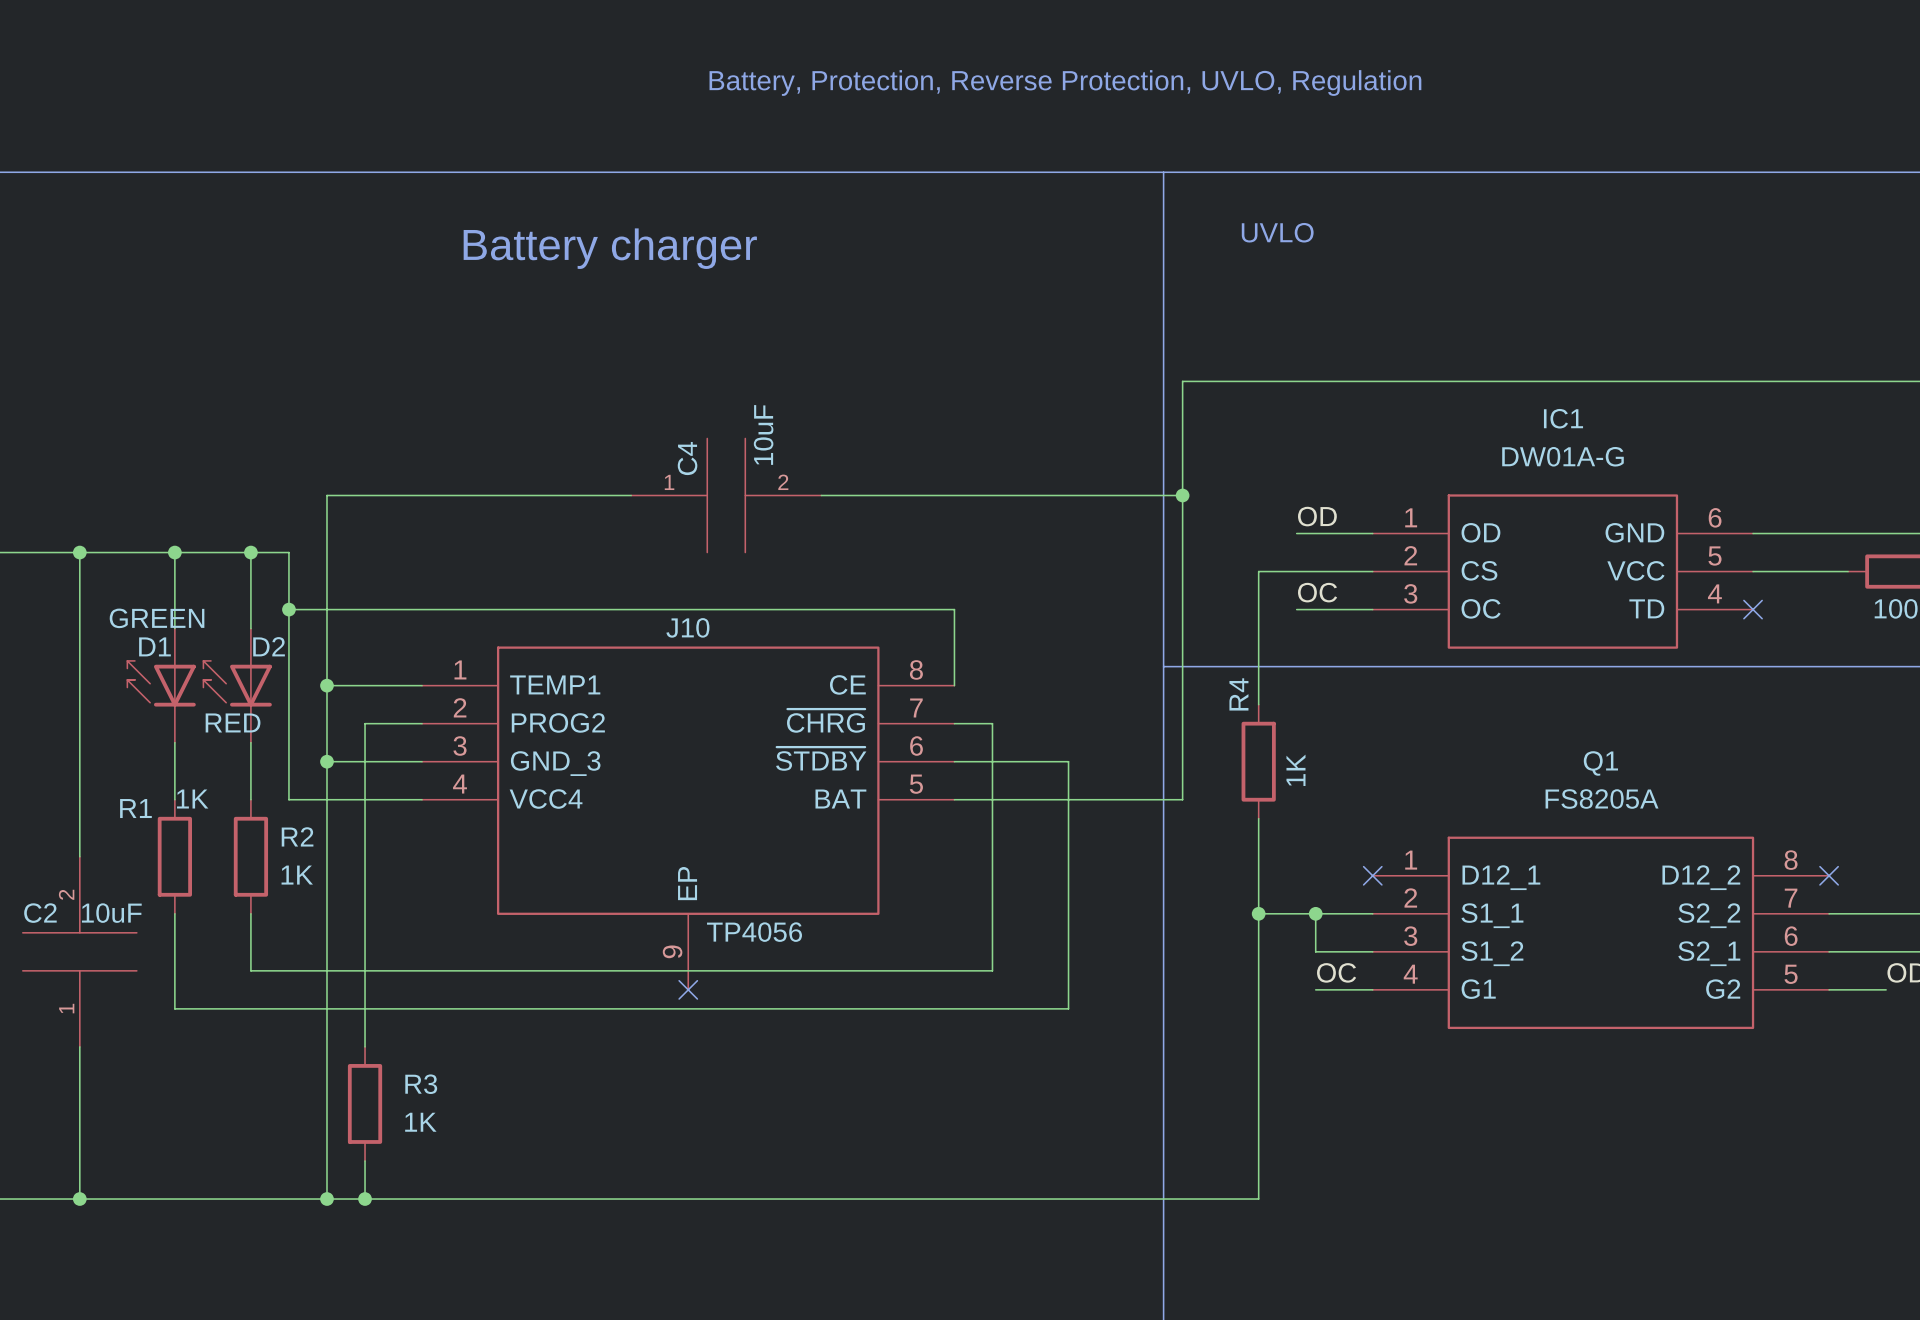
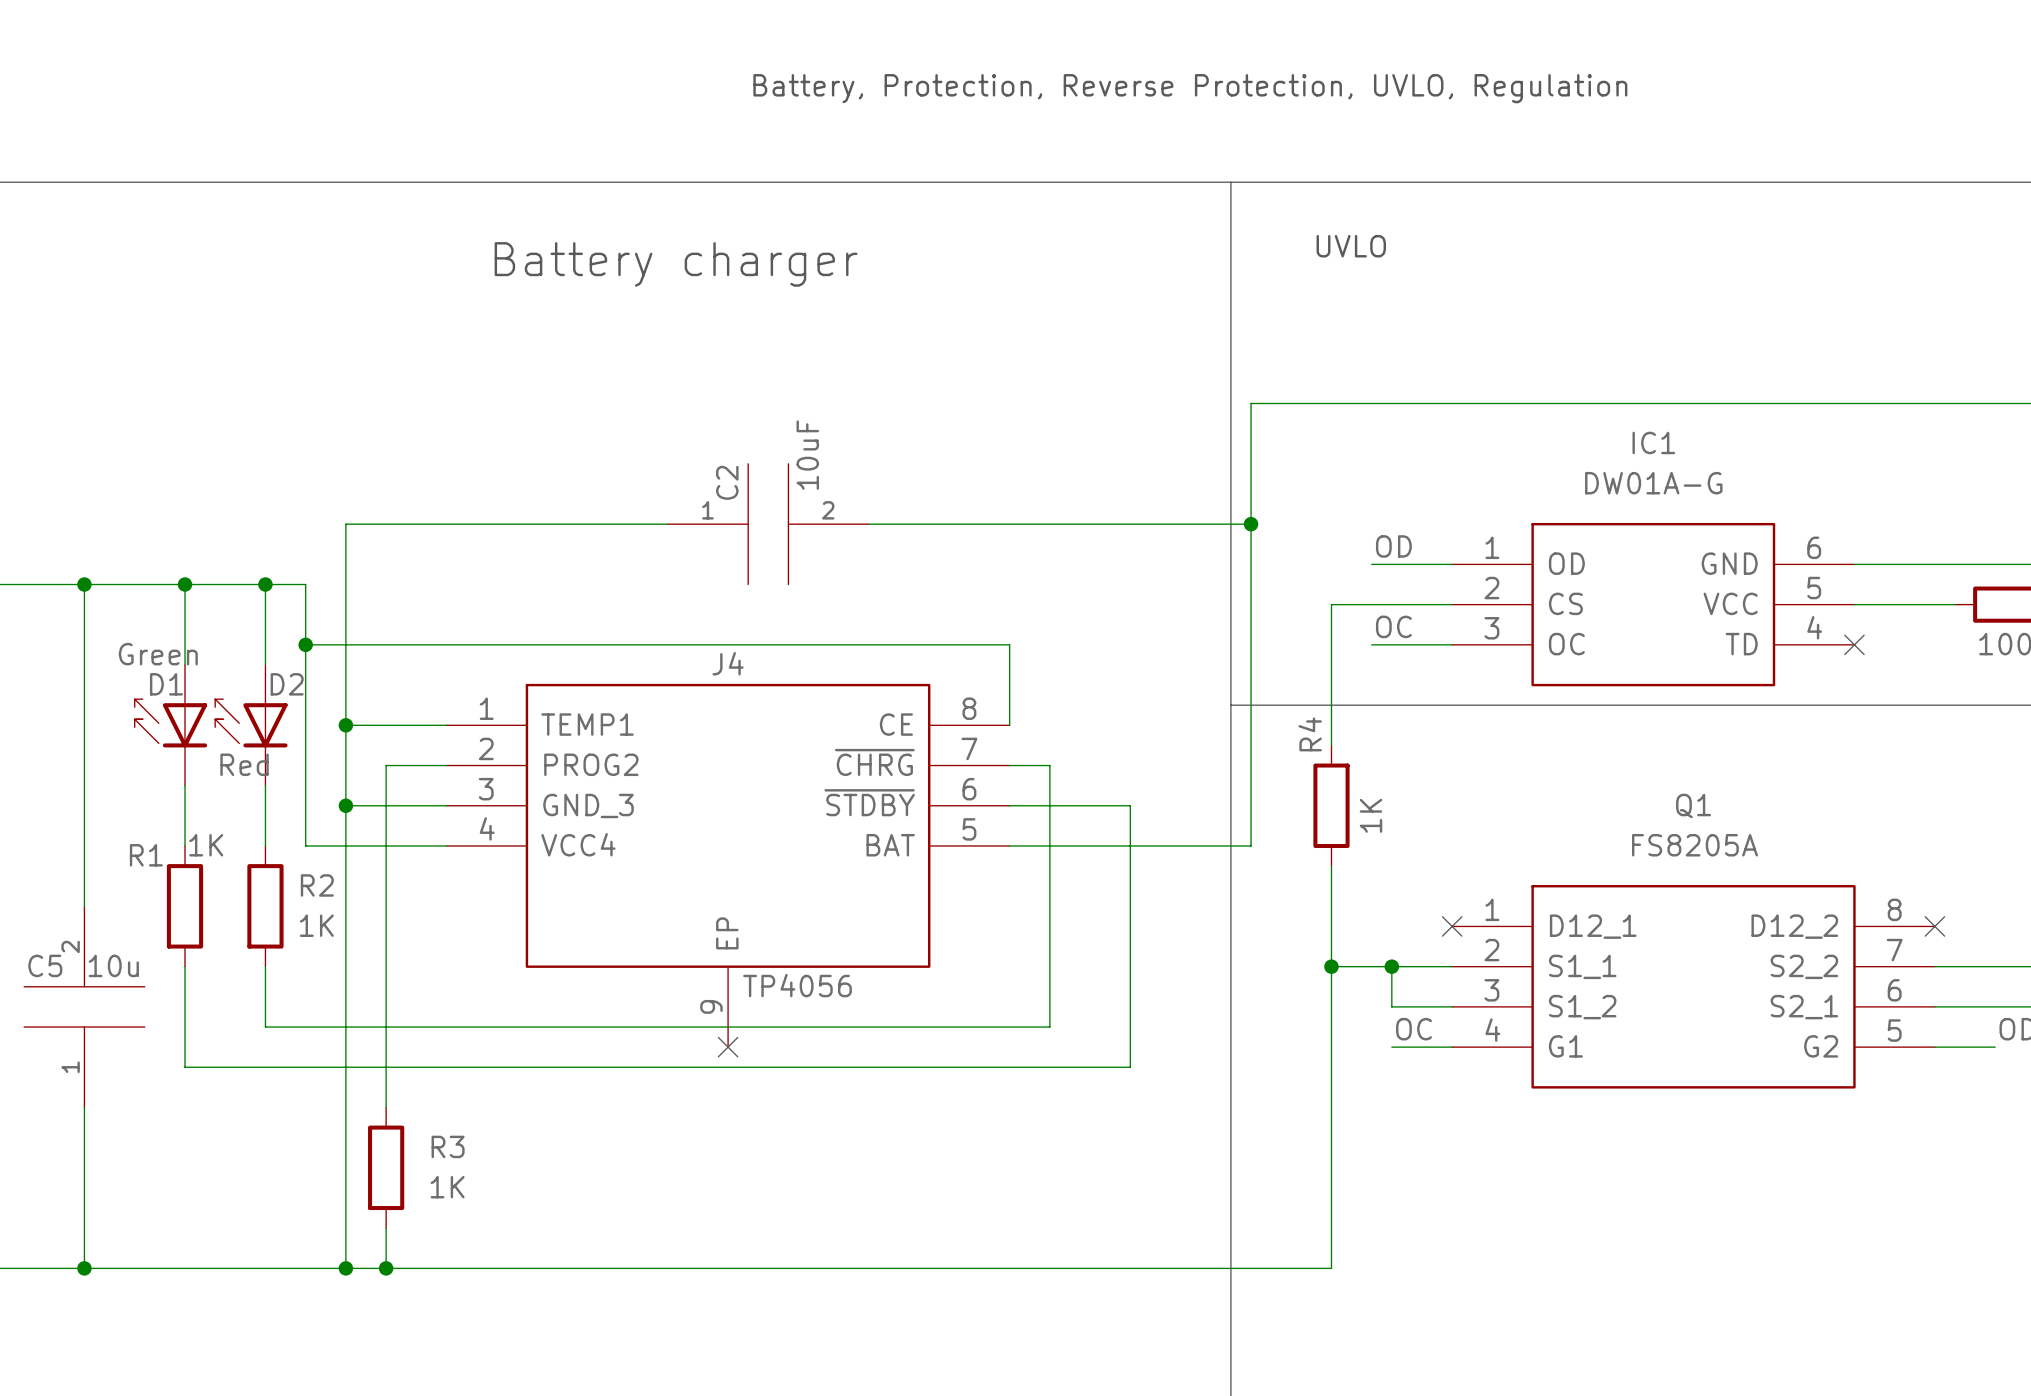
C4 name: C4 (687, 458) -> C2 (727, 482)
D1 value: GREEN (157, 618) -> Green (158, 654)
J10 name: J10 (687, 627) -> J4 (728, 663)
D2 value: RED (233, 722) -> Red (244, 764)
C2 name: C2 (40, 913) -> C5 (45, 965)
C2 value: 10uF (111, 913) -> 10u (113, 965)

